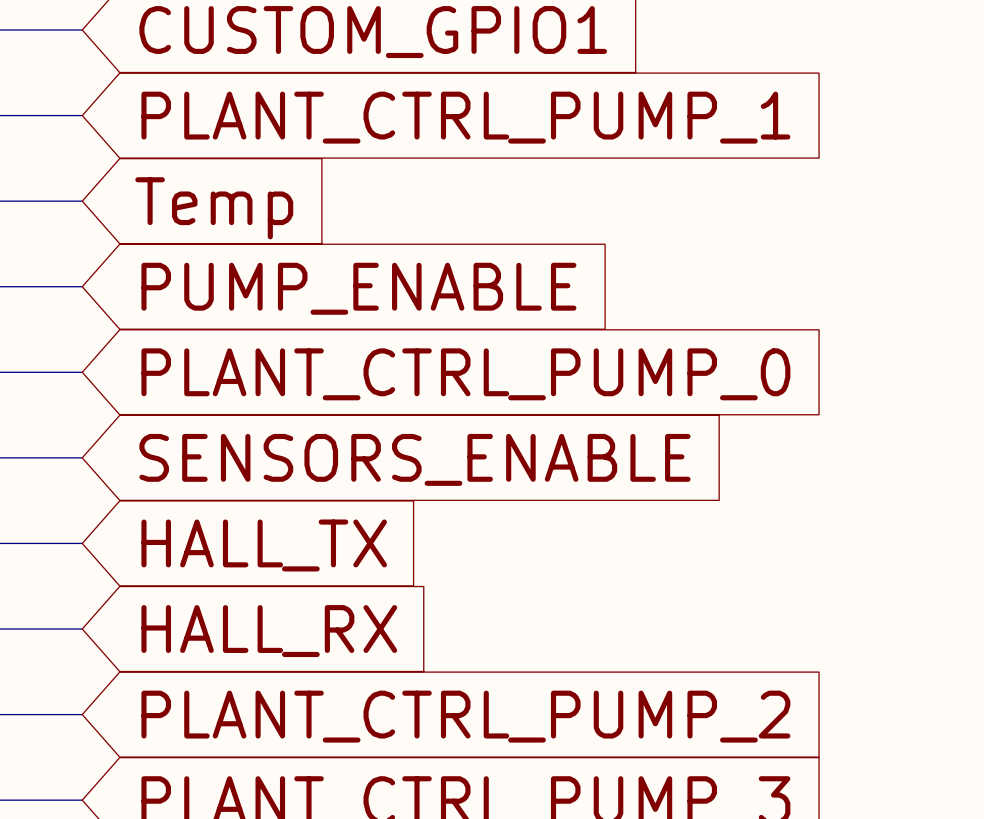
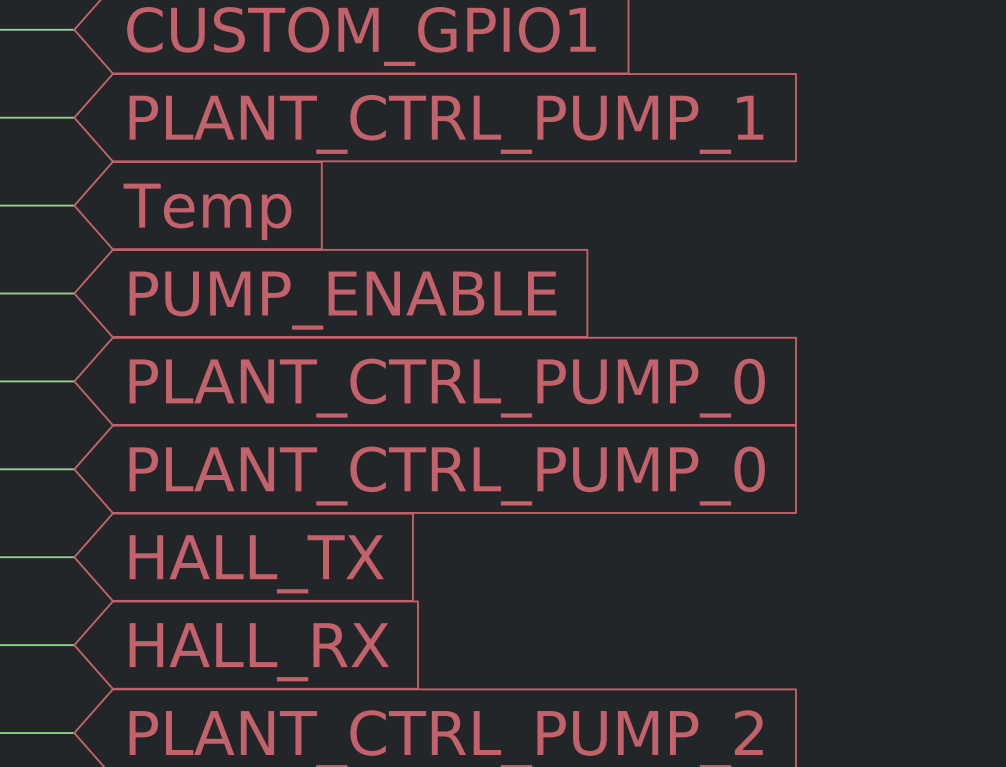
global label: SENSORS_ENABLE (414, 459) -> PLANT_CTRL_PUMP_0 (447, 476)

